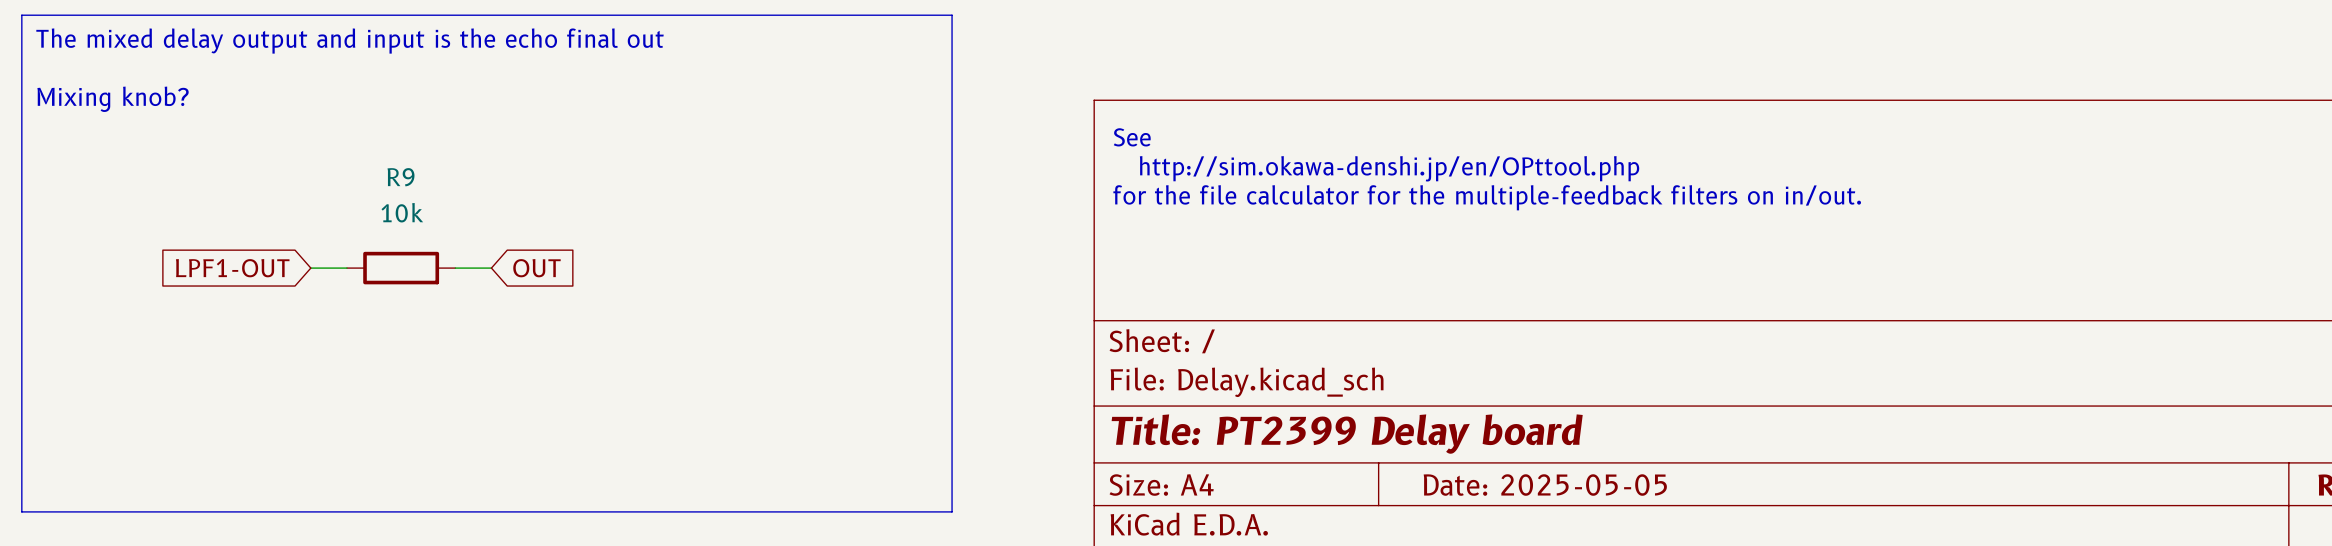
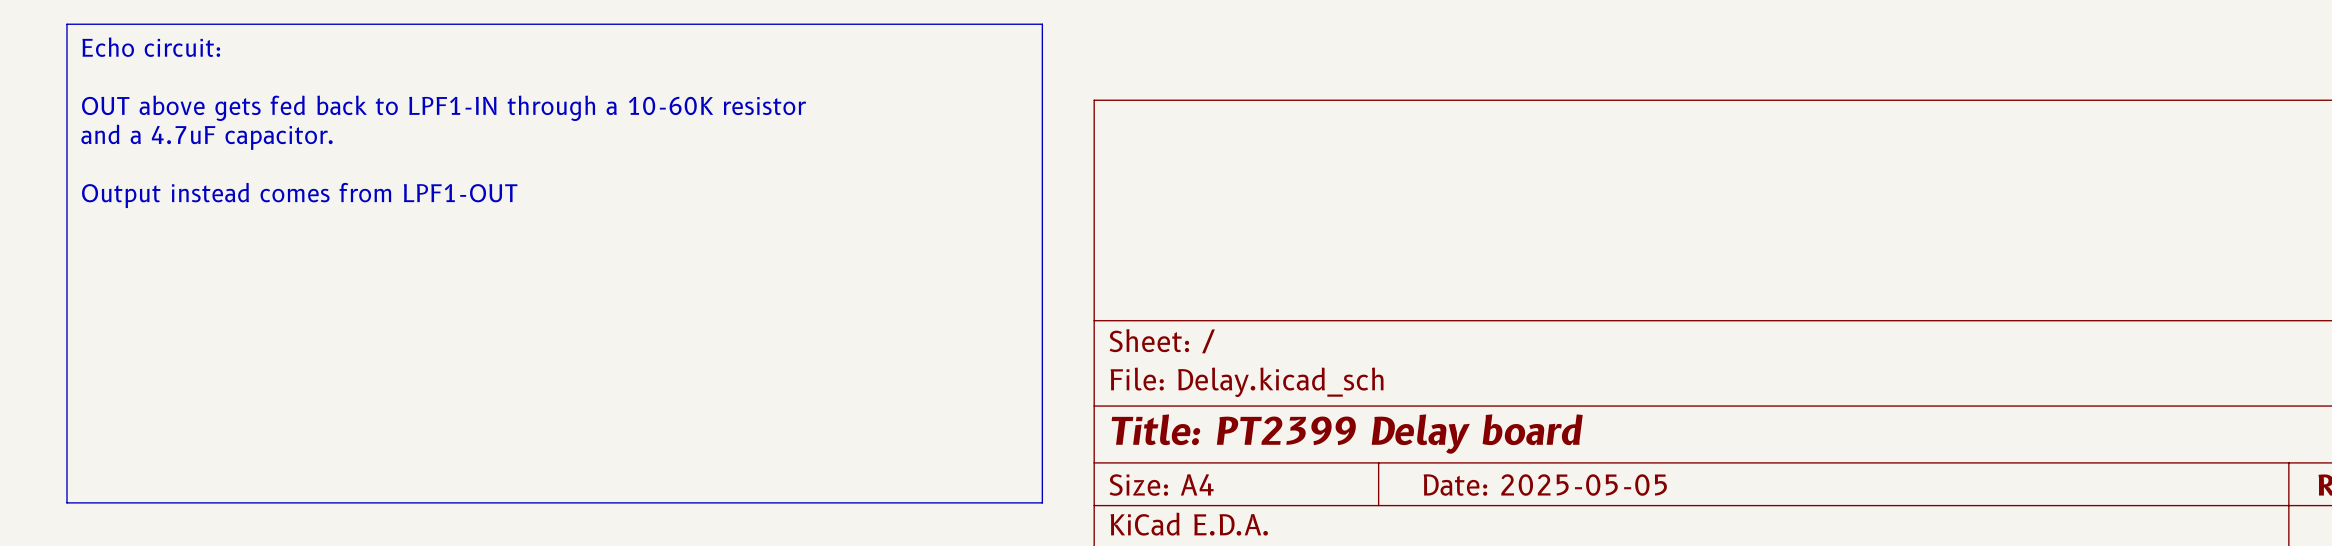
line: (21, 15) (952, 15) (952, 511) (21, 511) (21, 15) -> (66, 24) (66, 502) (1042, 502) (1042, 24) (66, 24)
text: The mixed delay output and input is the echo final out (350, 41) -> none
text: none -> Echo circuit: (151, 47)
text: Mixing knob? (113, 99) -> none
text: none -> OUT above gets fed back to LPF1-IN through a 10-60K resistor (444, 108)
text: none -> and a 4.7uF capacitor. (207, 137)
text: See (1132, 137) -> none
text: http://sim.okawa-denshi.jp/en/OPttool.php (1389, 168) -> none
text: none -> Output instead comes from LPF1-OUT (299, 195)
text: for the file calculator for the multiple-feedback filters on in/out. (1487, 197) -> none
global label: LPF1-OUT (232, 268) -> none
wire: (310, 268) (346, 268) -> none
R9: 10k (401, 268) -> none
wire: (455, 268) (491, 268) -> none
global label: OUT (536, 268) -> none

